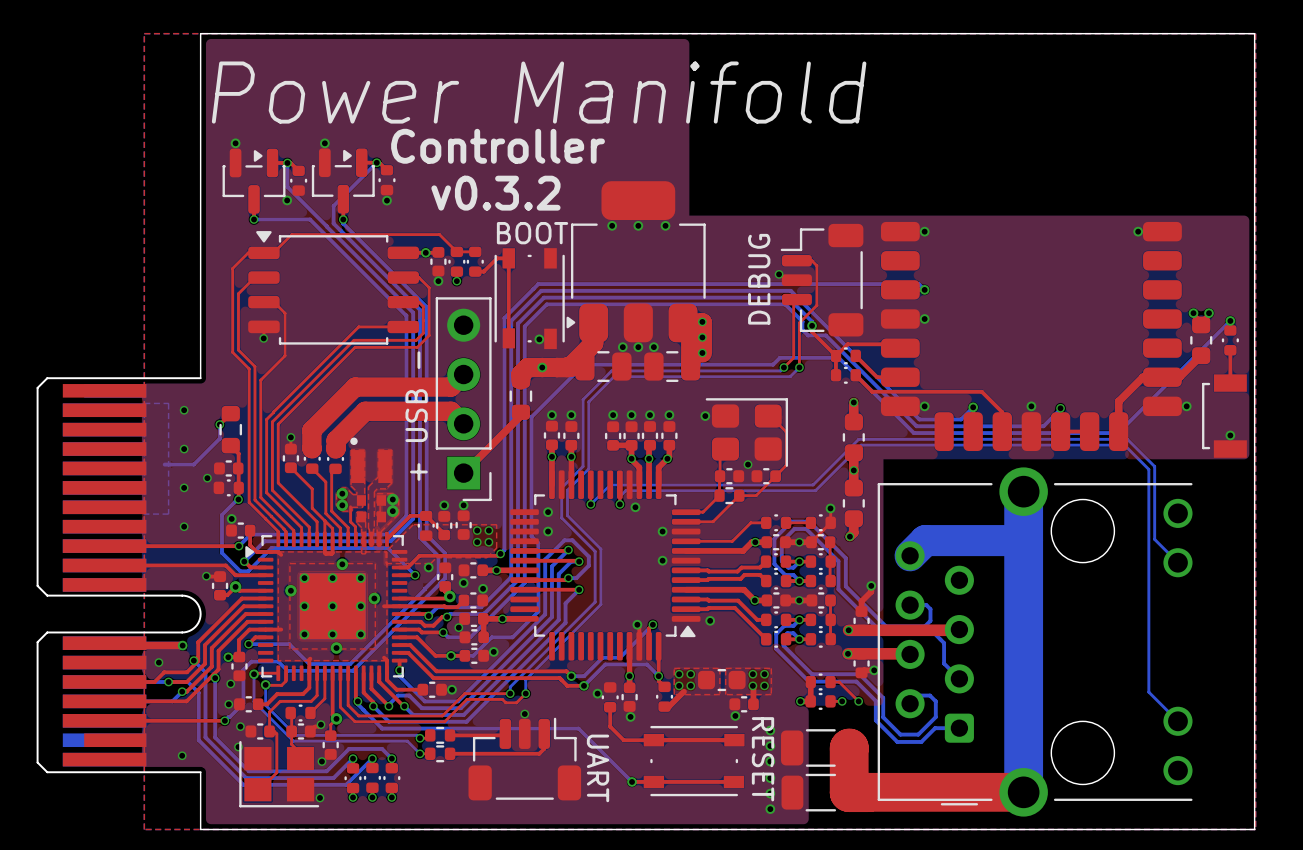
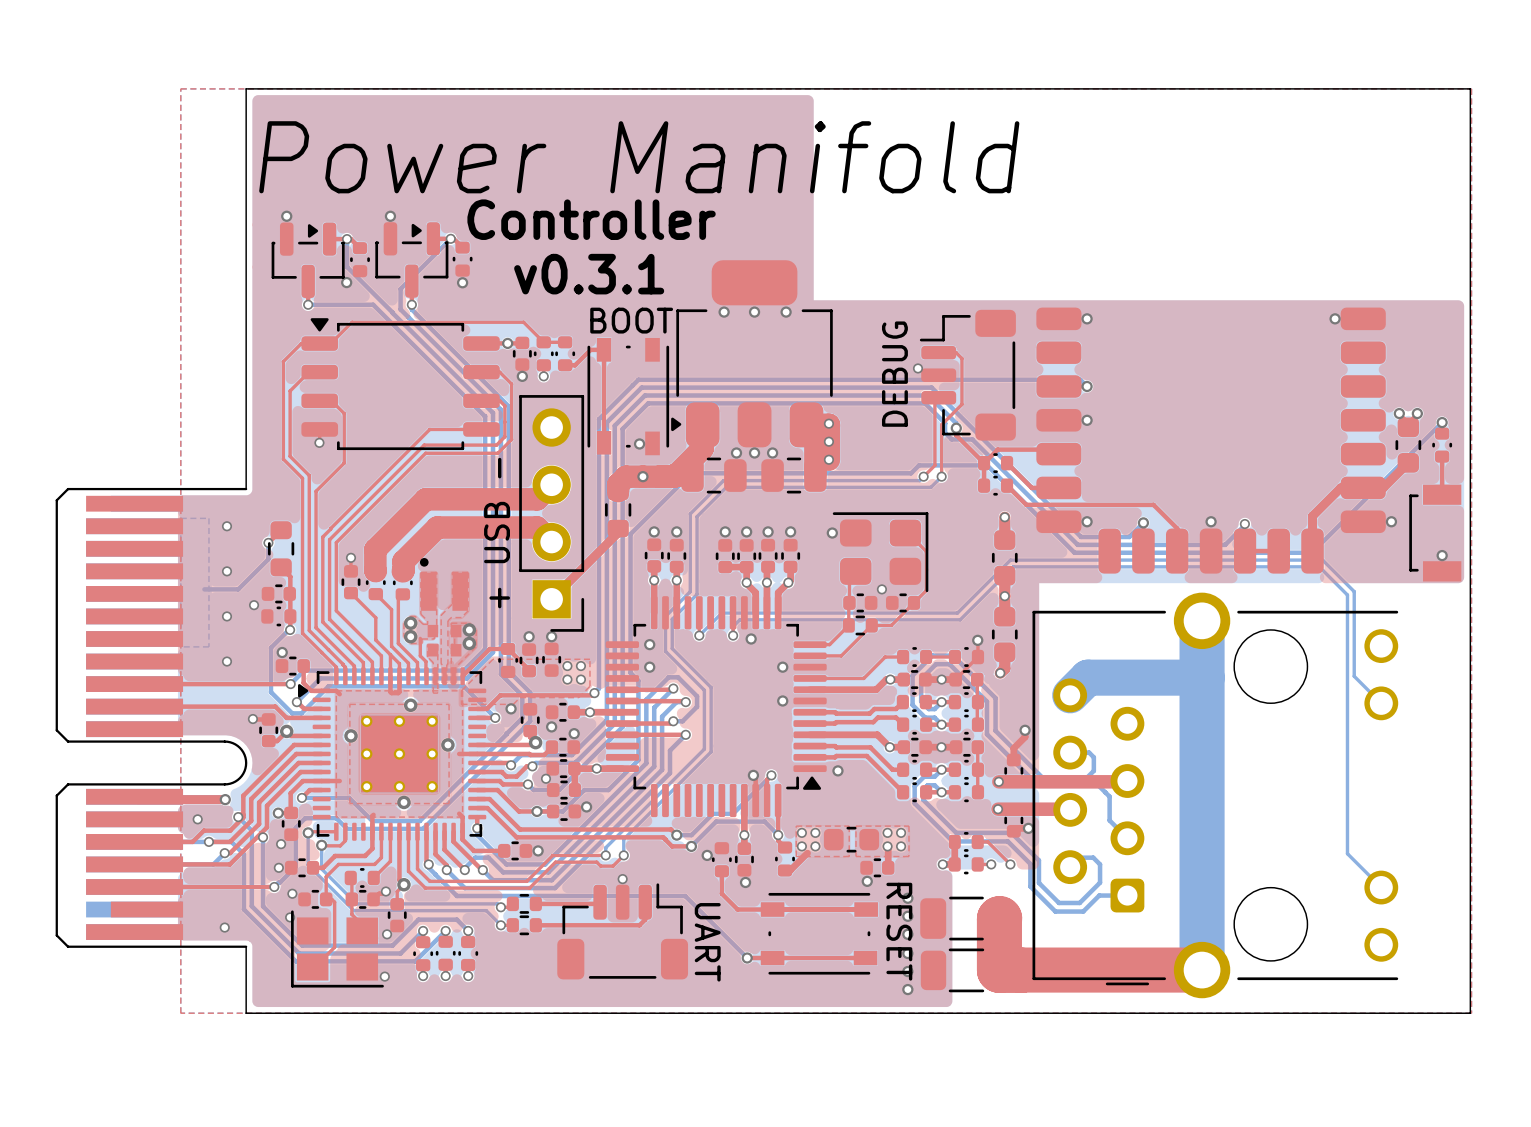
text: v0.3.2 (495, 193) -> v0.3.1 (589, 274)

